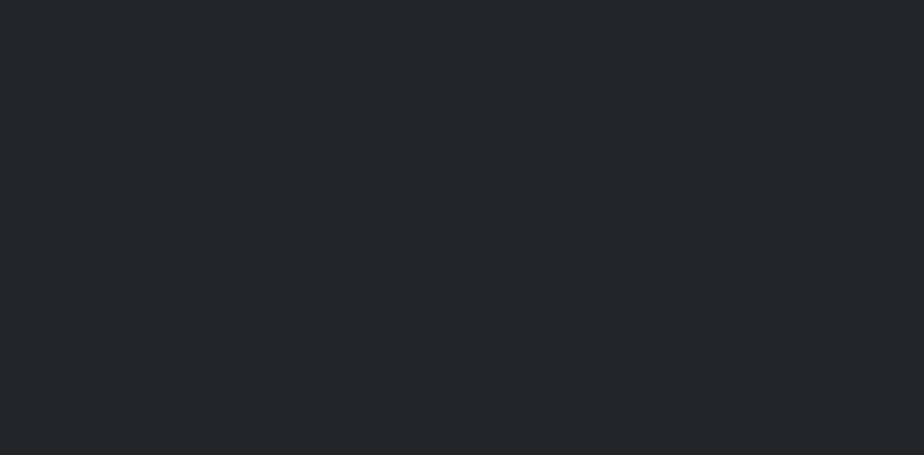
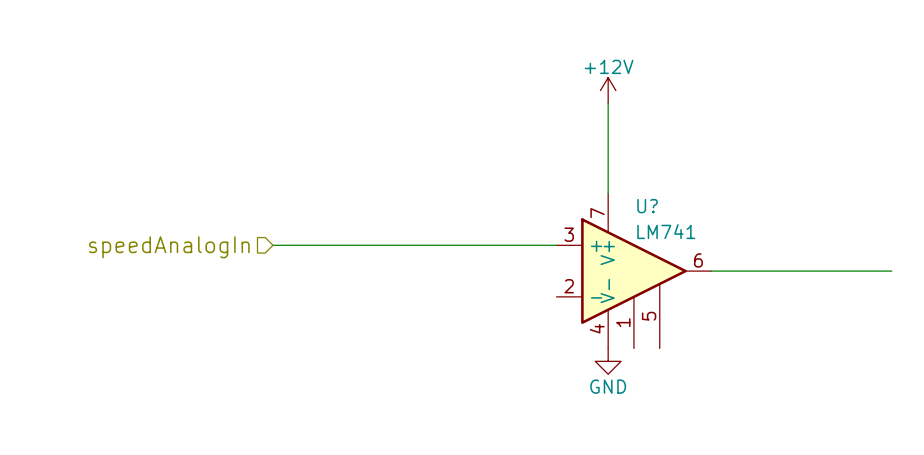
power symbol: none -> +12V (608, 90)
wire: none -> (608, 103) (608, 193)
wire: none -> (272, 245) (556, 245)
hierarchical label: none -> speedAnalogIn (169, 247)
U?: none -> LM741 (633, 271)
wire: none -> (711, 271) (891, 271)
power symbol: none -> GND (608, 361)

